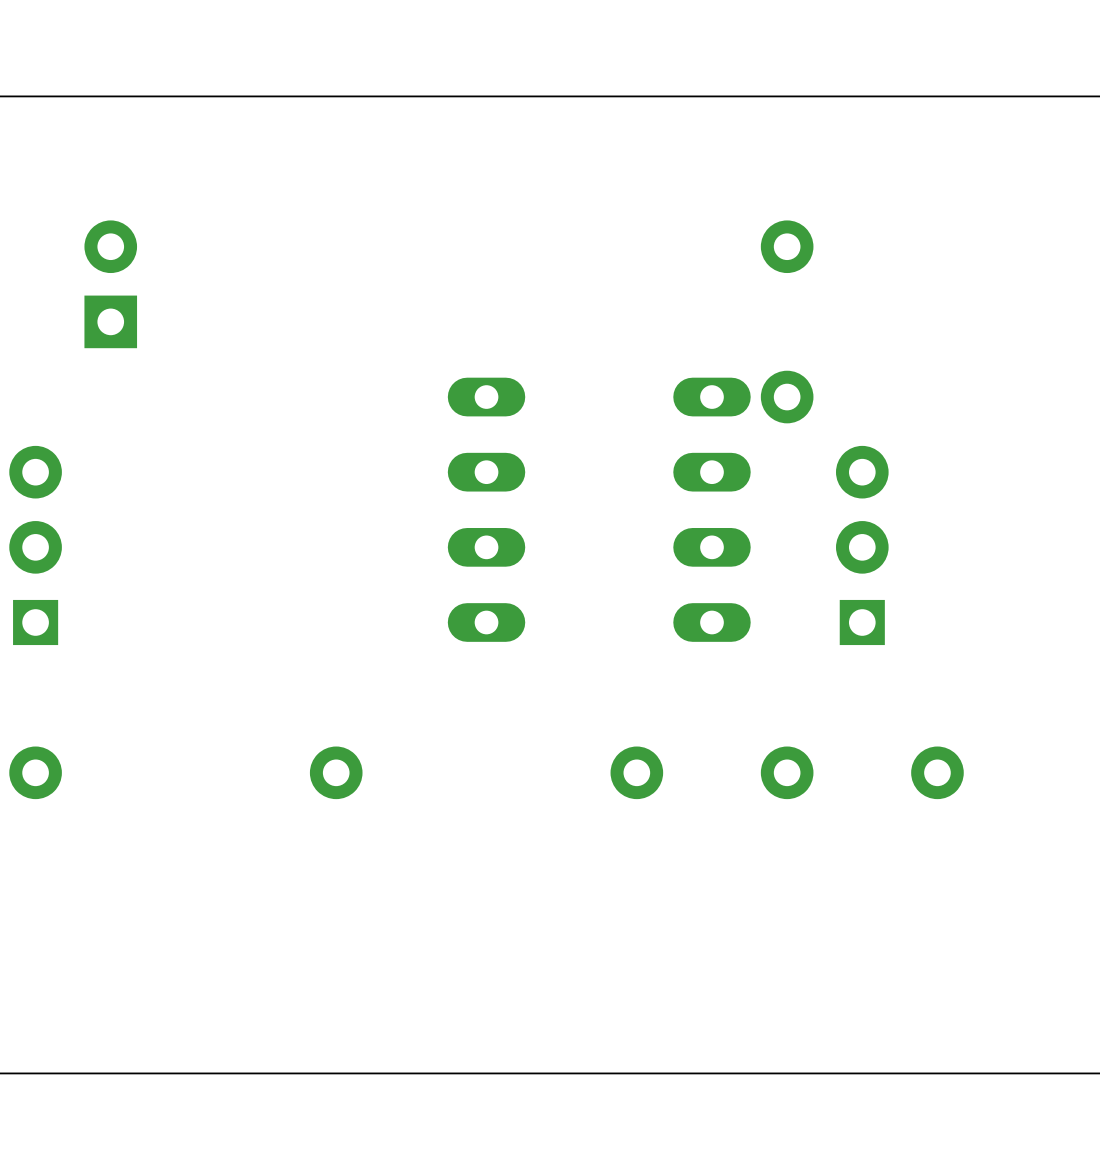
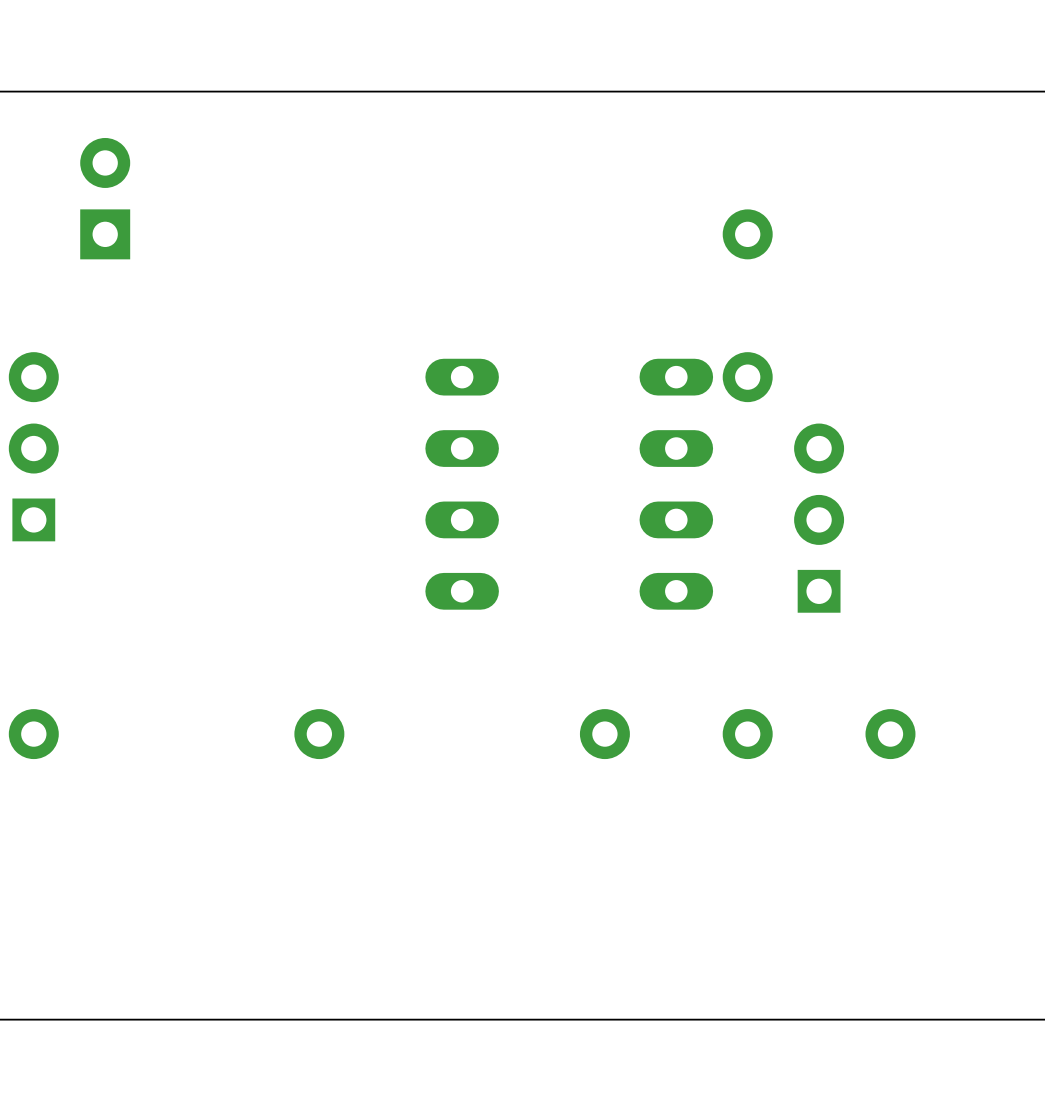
part position: (110, 284) -> (105, 198)
part position: (35, 545) -> (33, 446)

